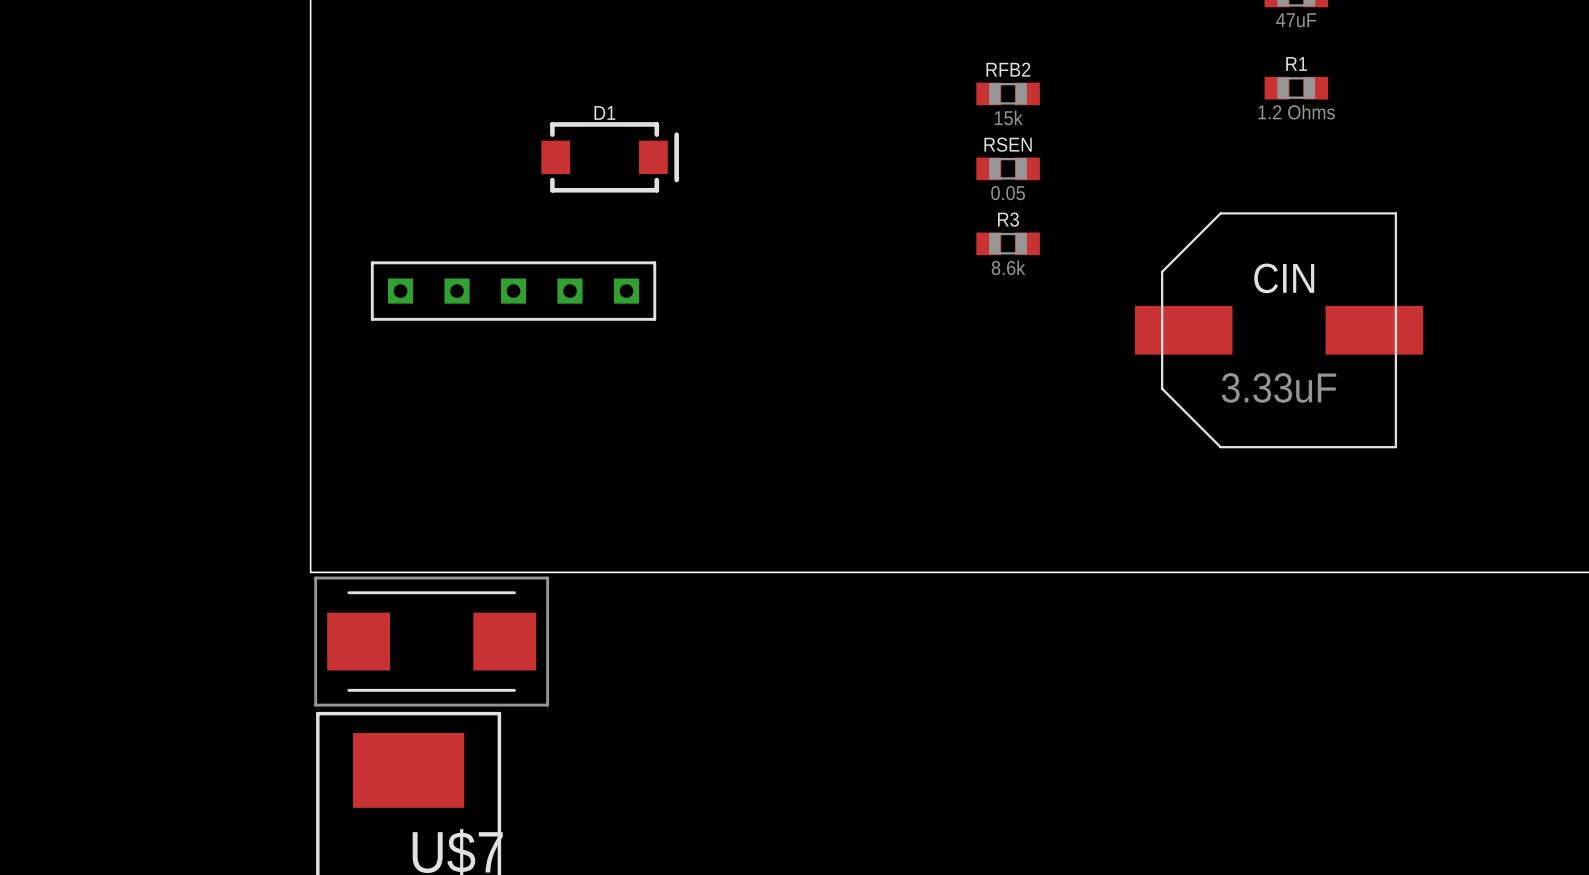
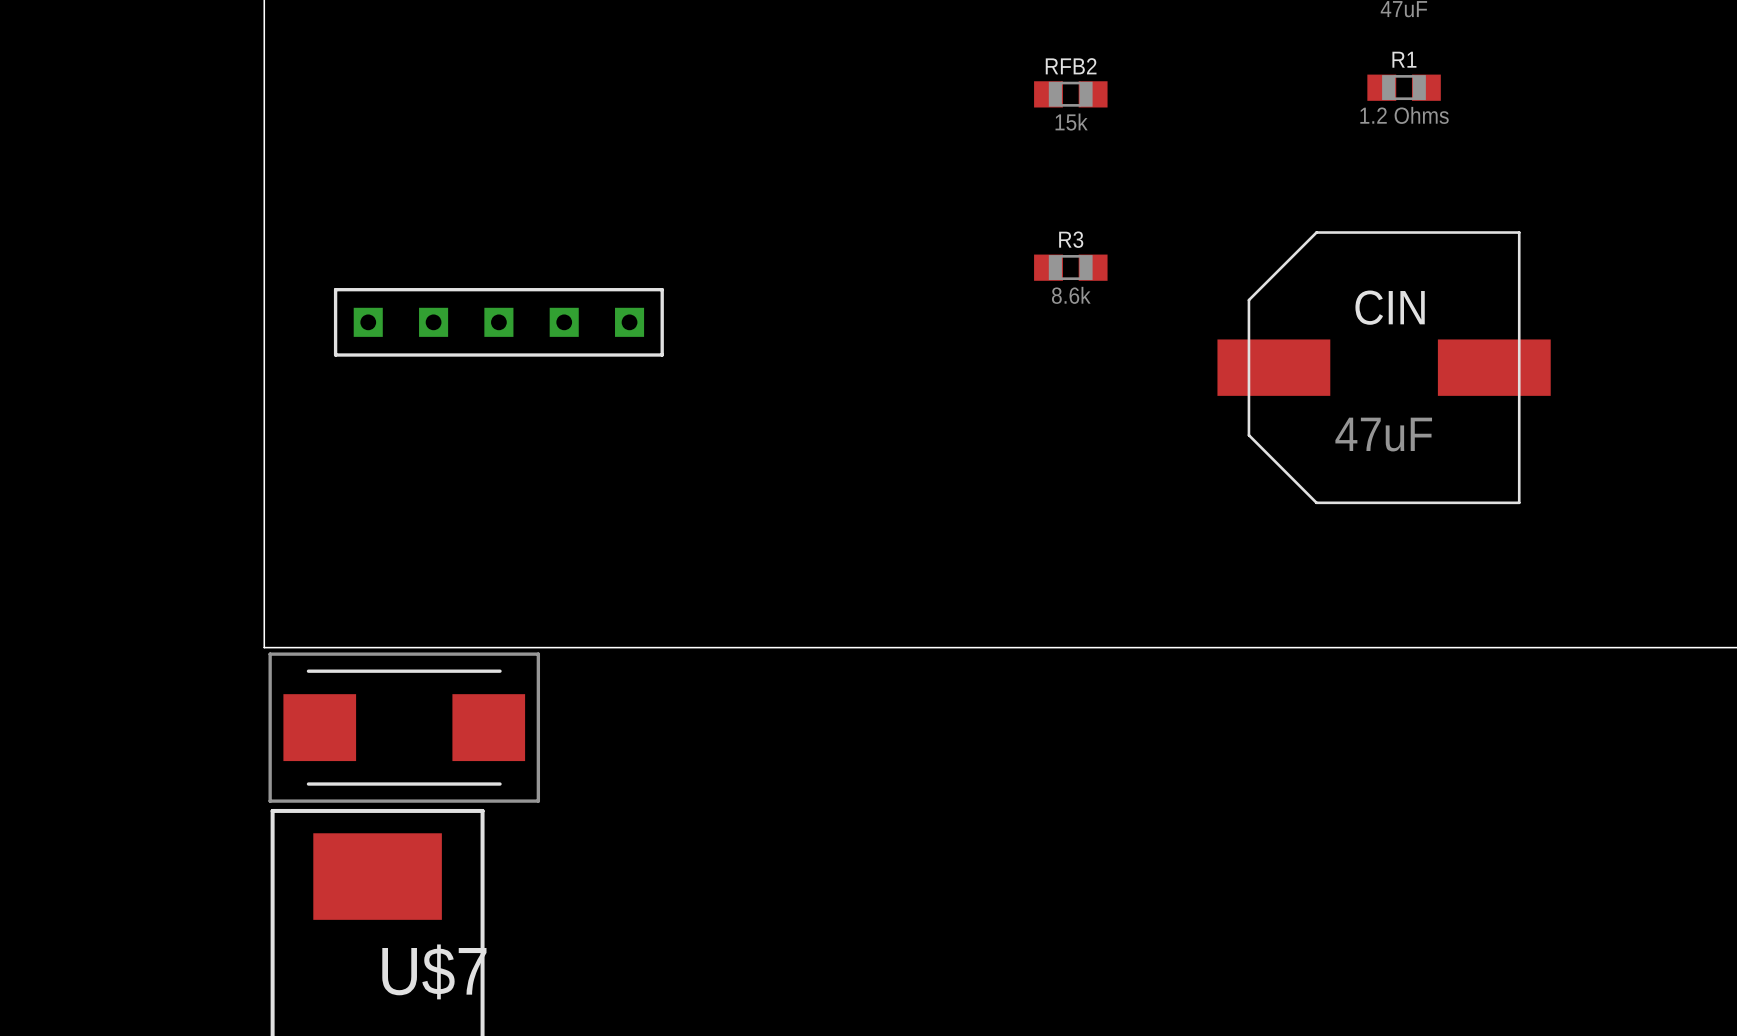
D1: (610, 157) -> none
RSEN: 0.05 (1008, 168) -> none
CIN value: 3.33uF (1278, 387) -> 47uF (1383, 434)

